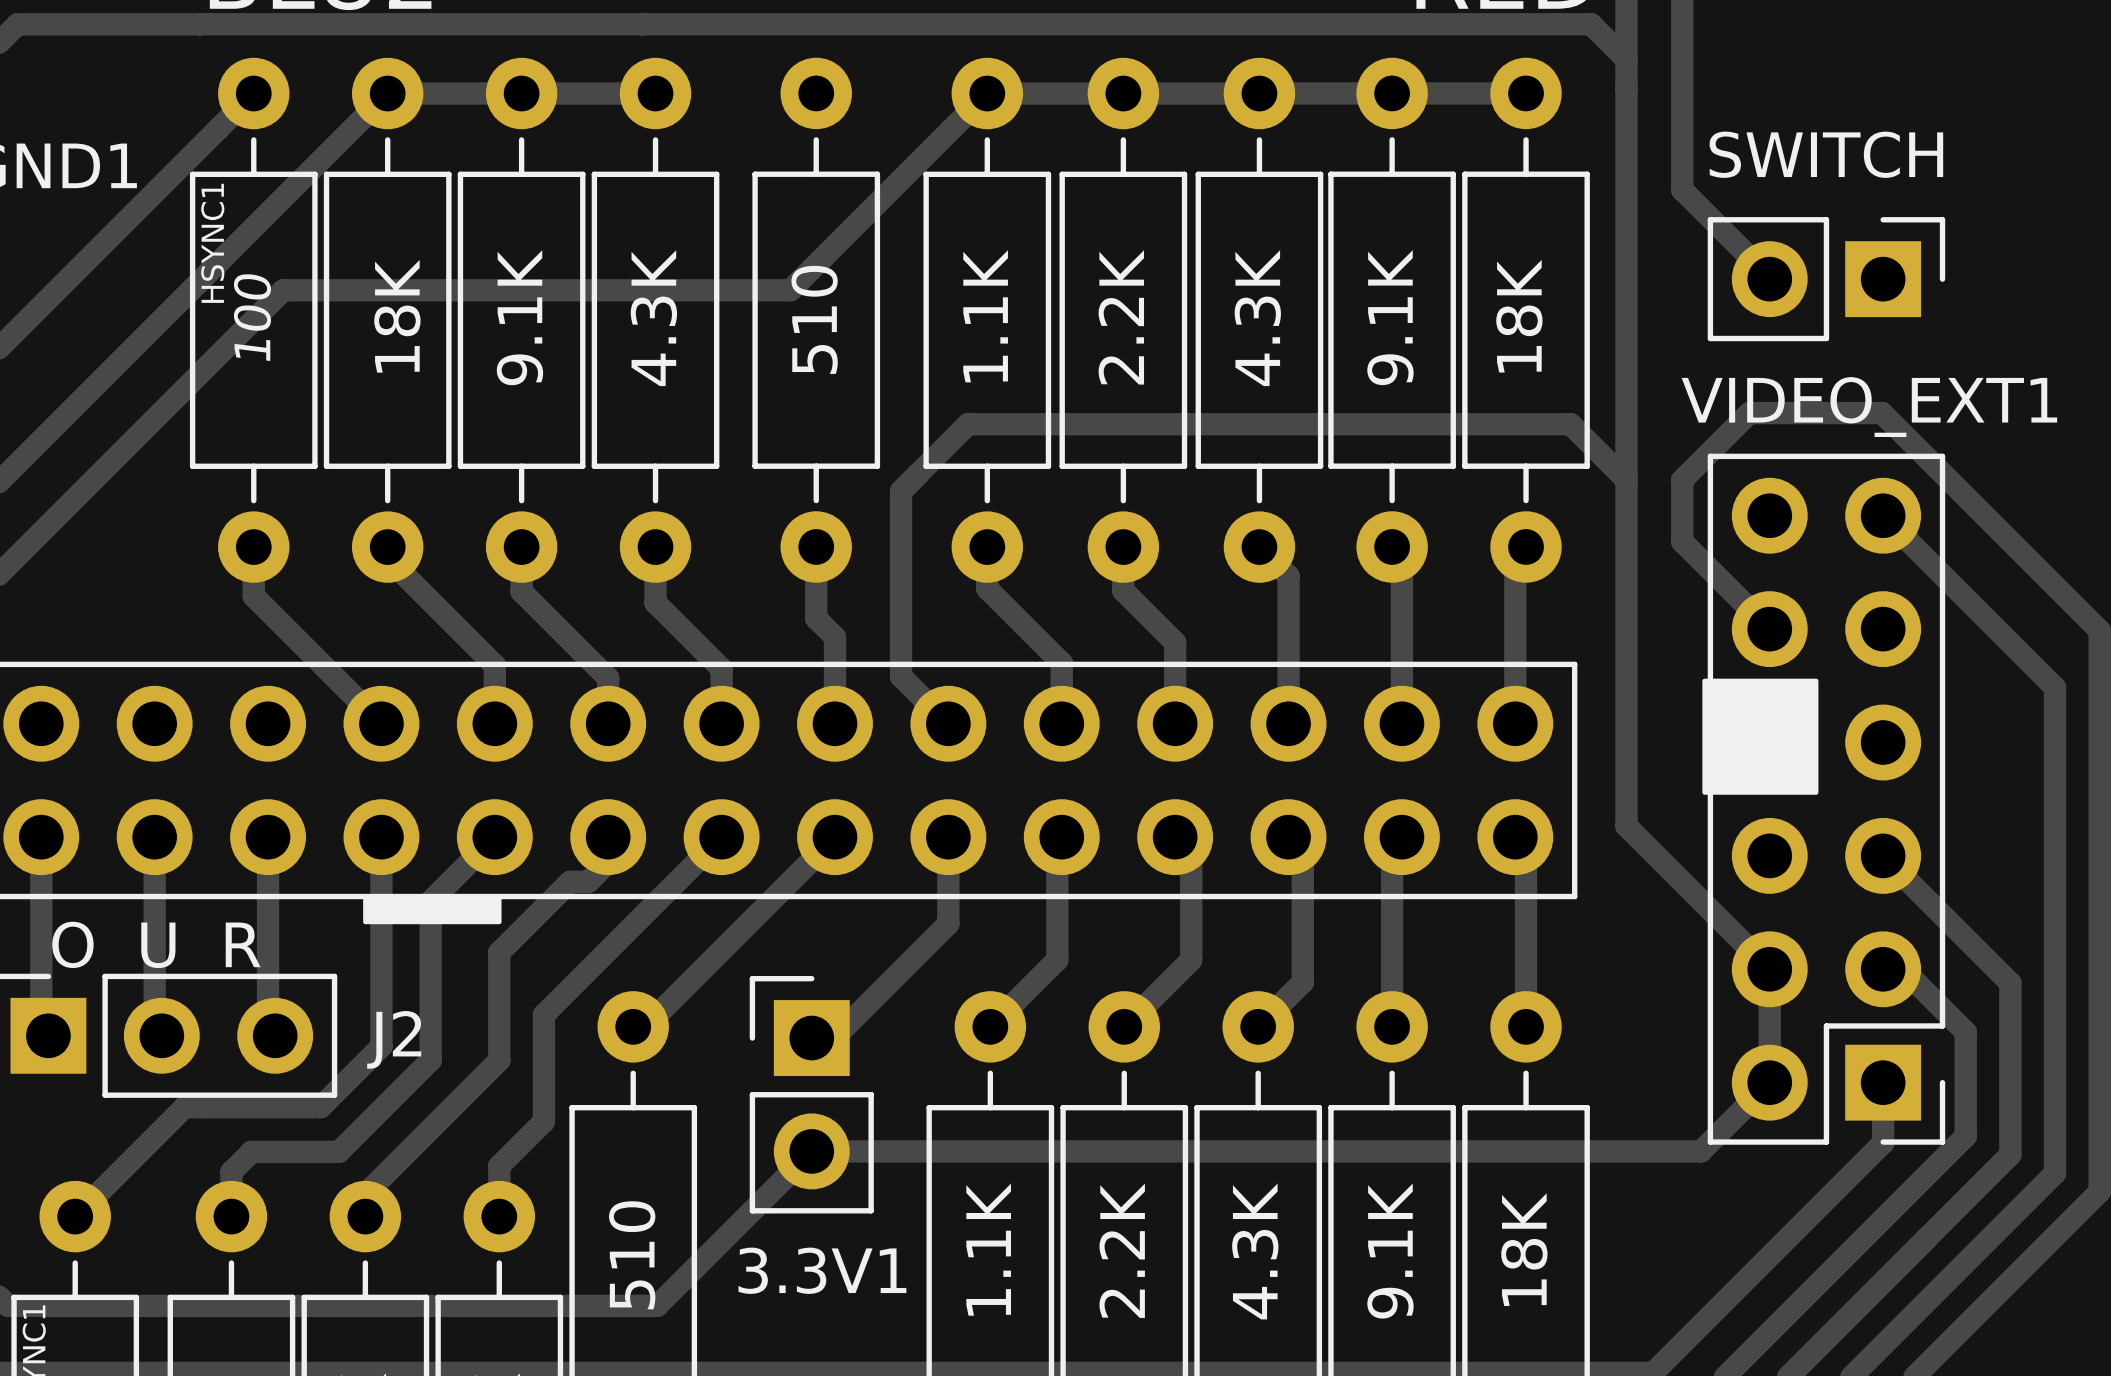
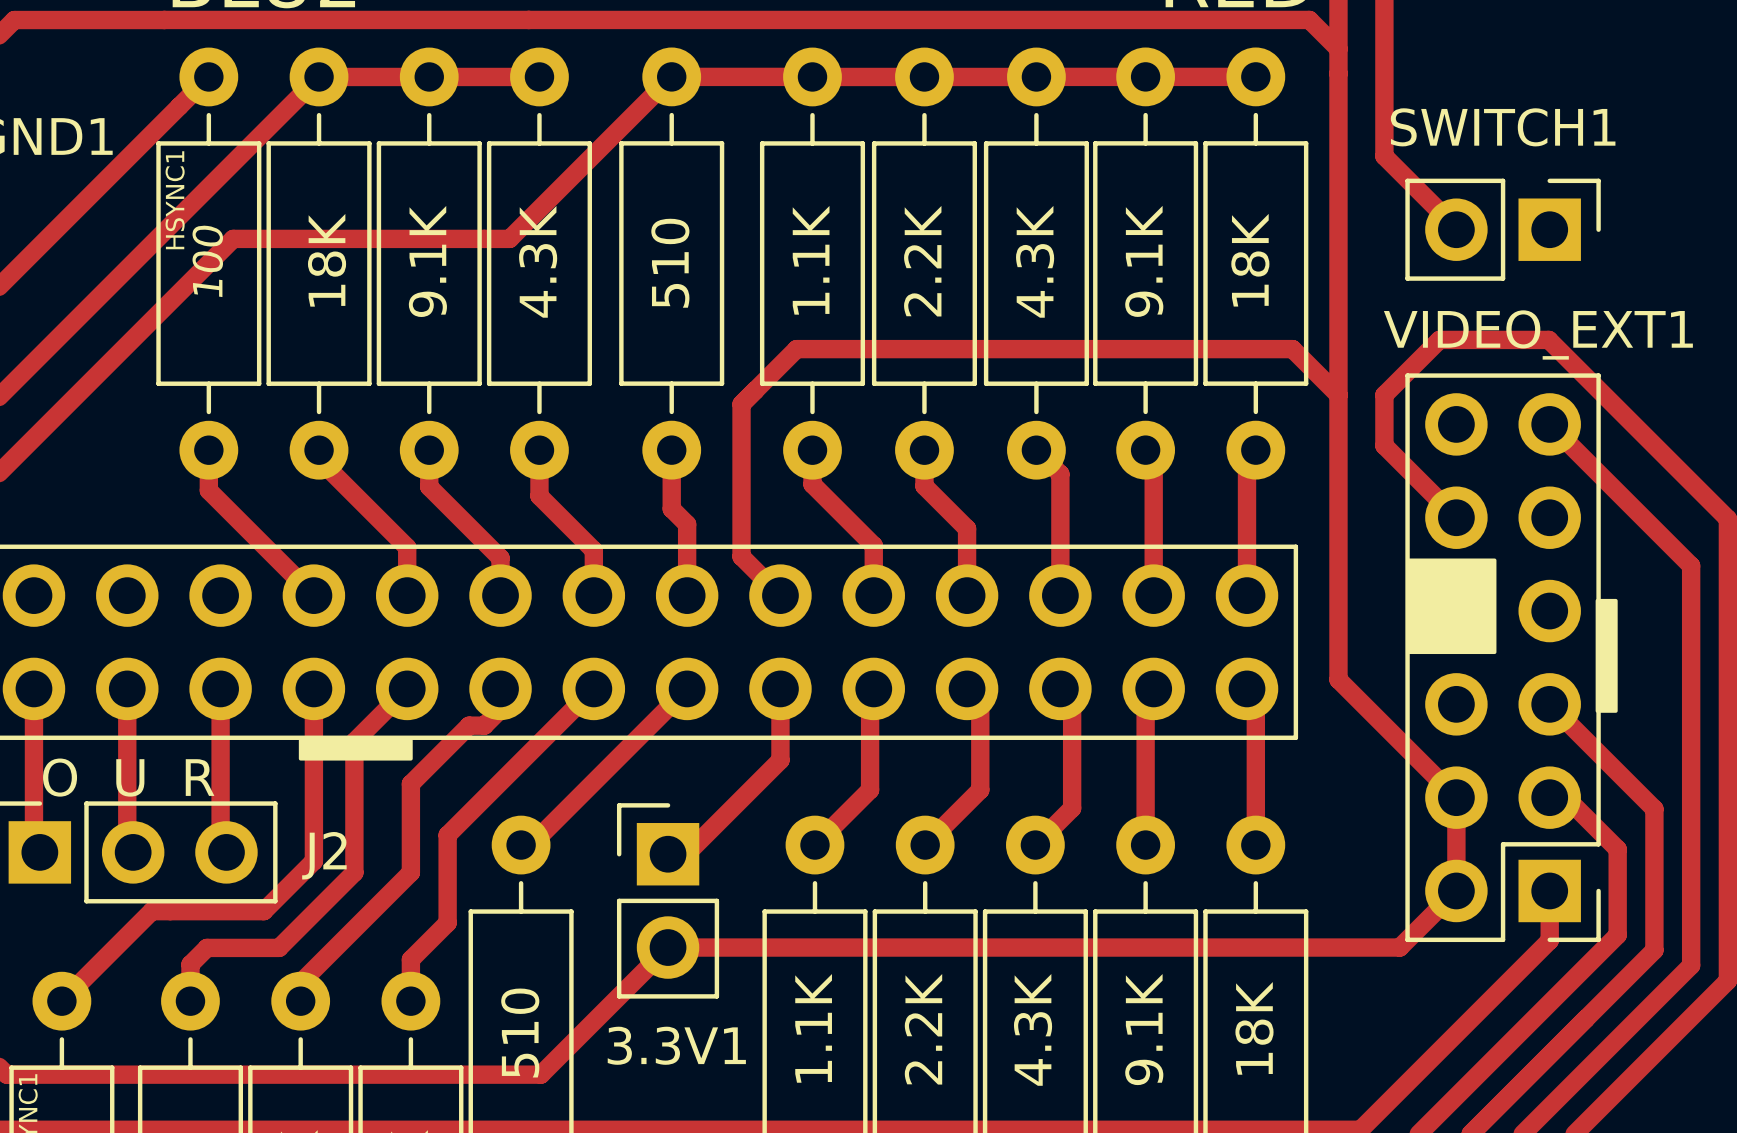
track: (987, 93) (790, 290) (619, 290) -> (812, 76) (671, 76) (509, 238)
SWITCH name: SWITCH (1826, 154) -> SWITCH1 (1503, 127)
drawing shape: [1702, 678, 1819, 795] -> [1406, 558, 1497, 655]
drawing: none -> [1595, 598, 1618, 713]

